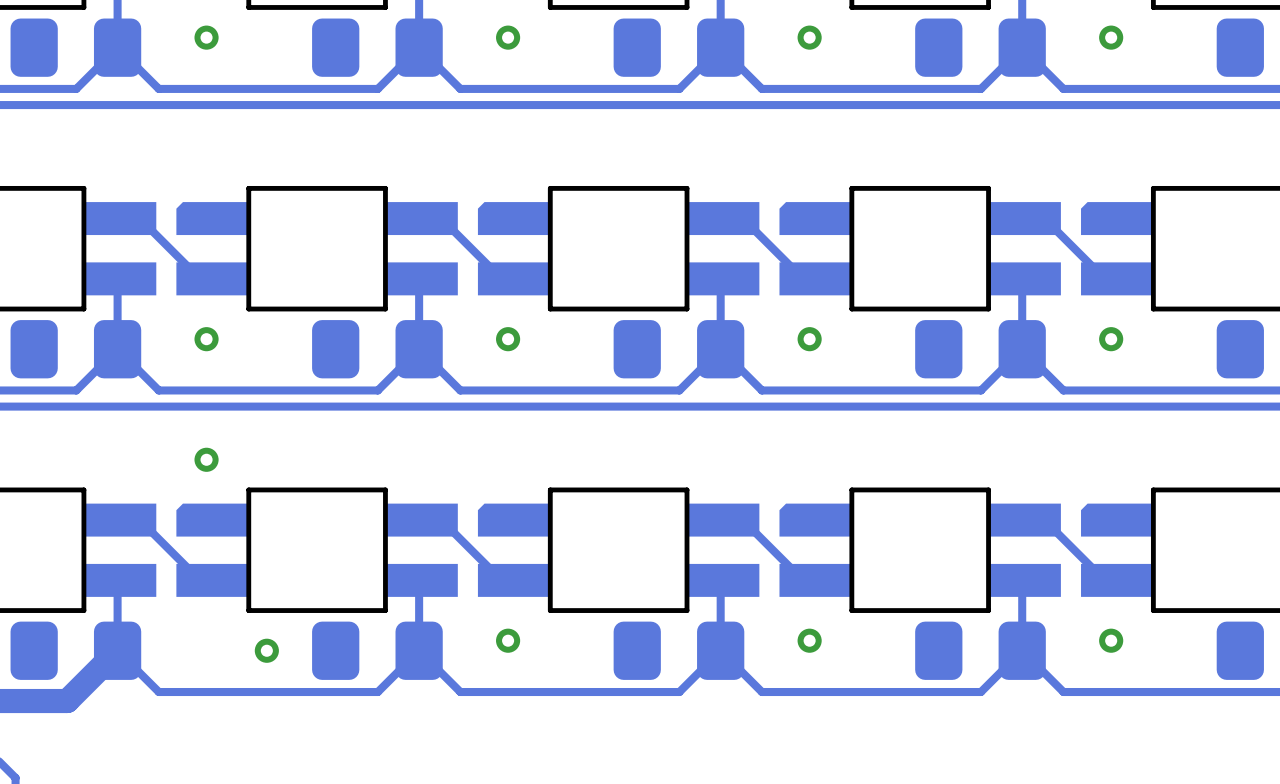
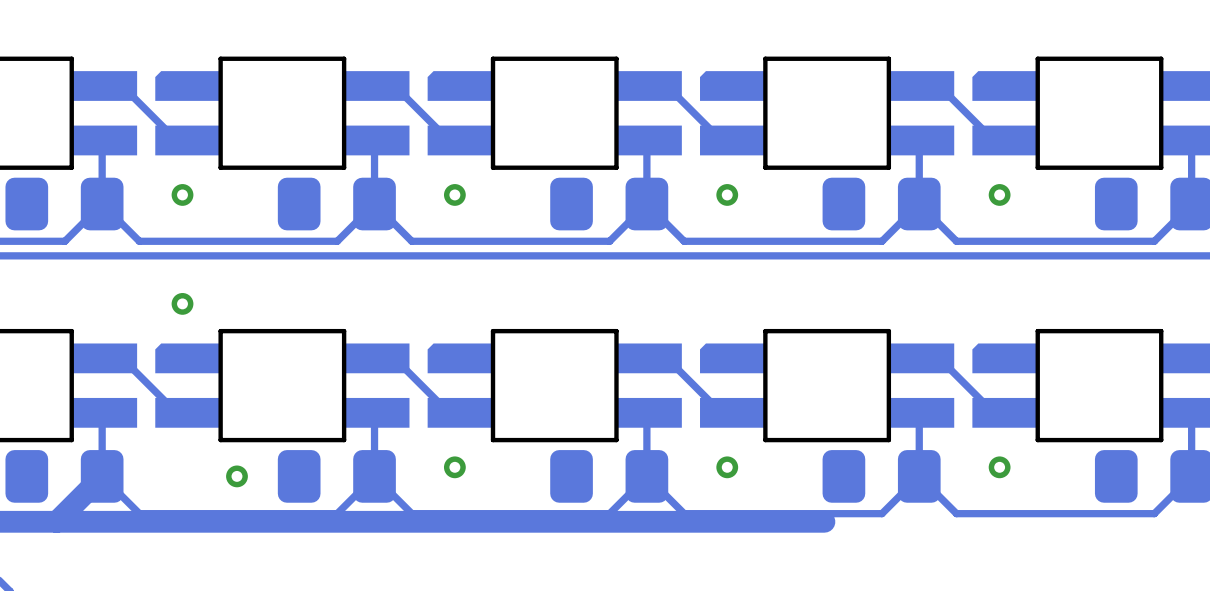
bottom track: none -> (56, 521) (824, 521)

